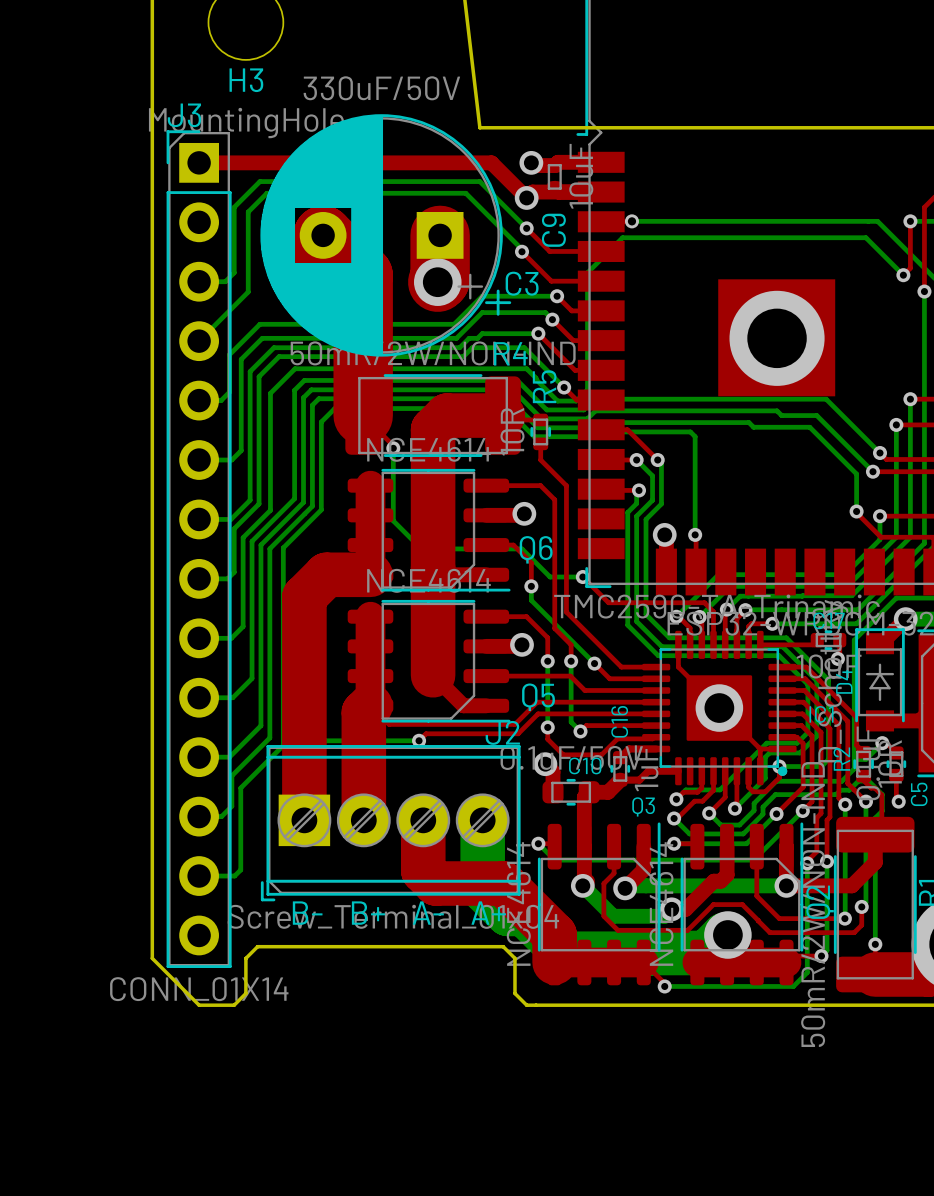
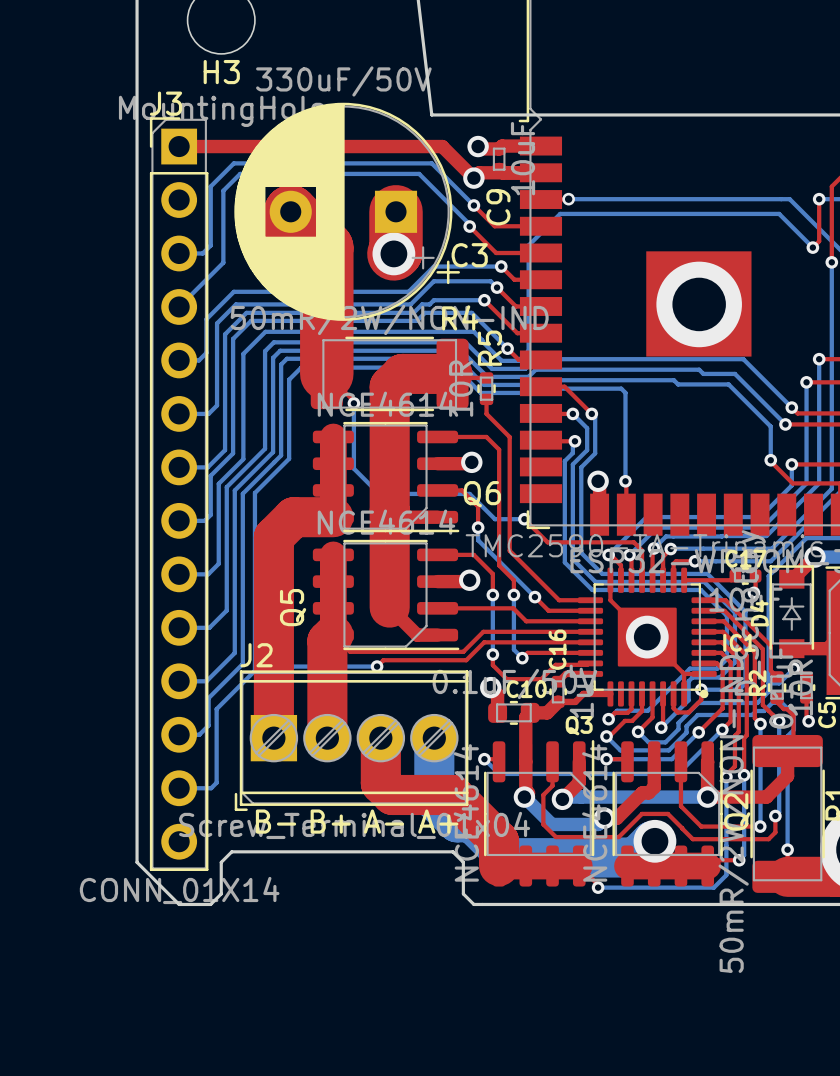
Q5 name rotation: 0° (538, 697) -> 90° counterclockwise (293, 607)
Q5 name position: Q5 (538, 697) -> Q5 (293, 607)
J2 name position: J2 (502, 732) -> J2 (256, 655)

